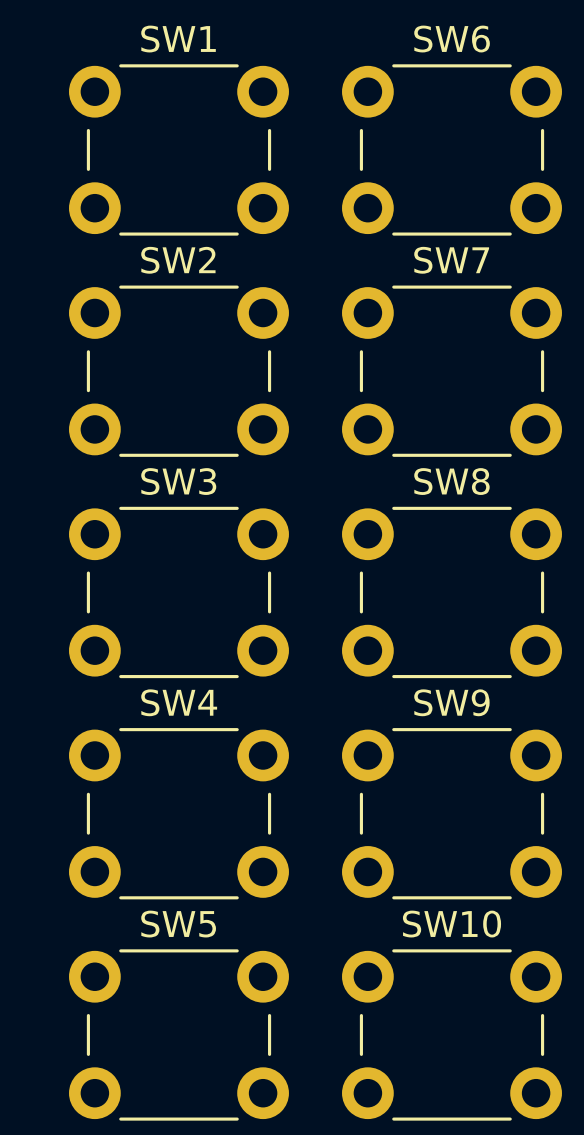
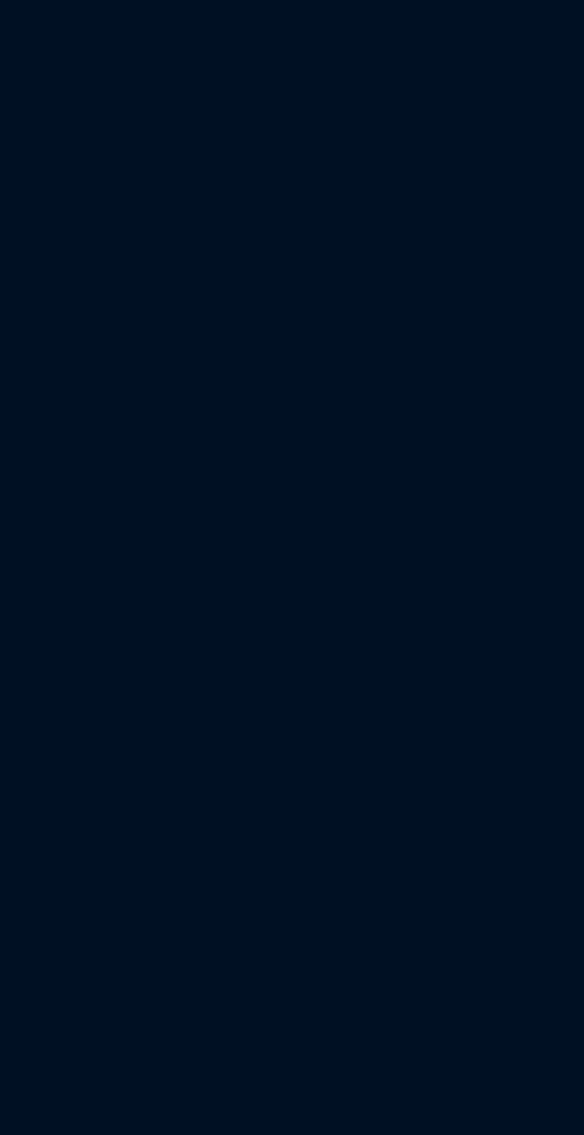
SW1: (178, 149) -> none
SW6: (452, 149) -> none
SW2: (178, 371) -> none
SW7: (452, 371) -> none
SW3: (178, 592) -> none
SW8: (452, 592) -> none
SW4: (178, 813) -> none
SW9: (452, 813) -> none
SW5: (178, 1034) -> none
SW10: (452, 1034) -> none

